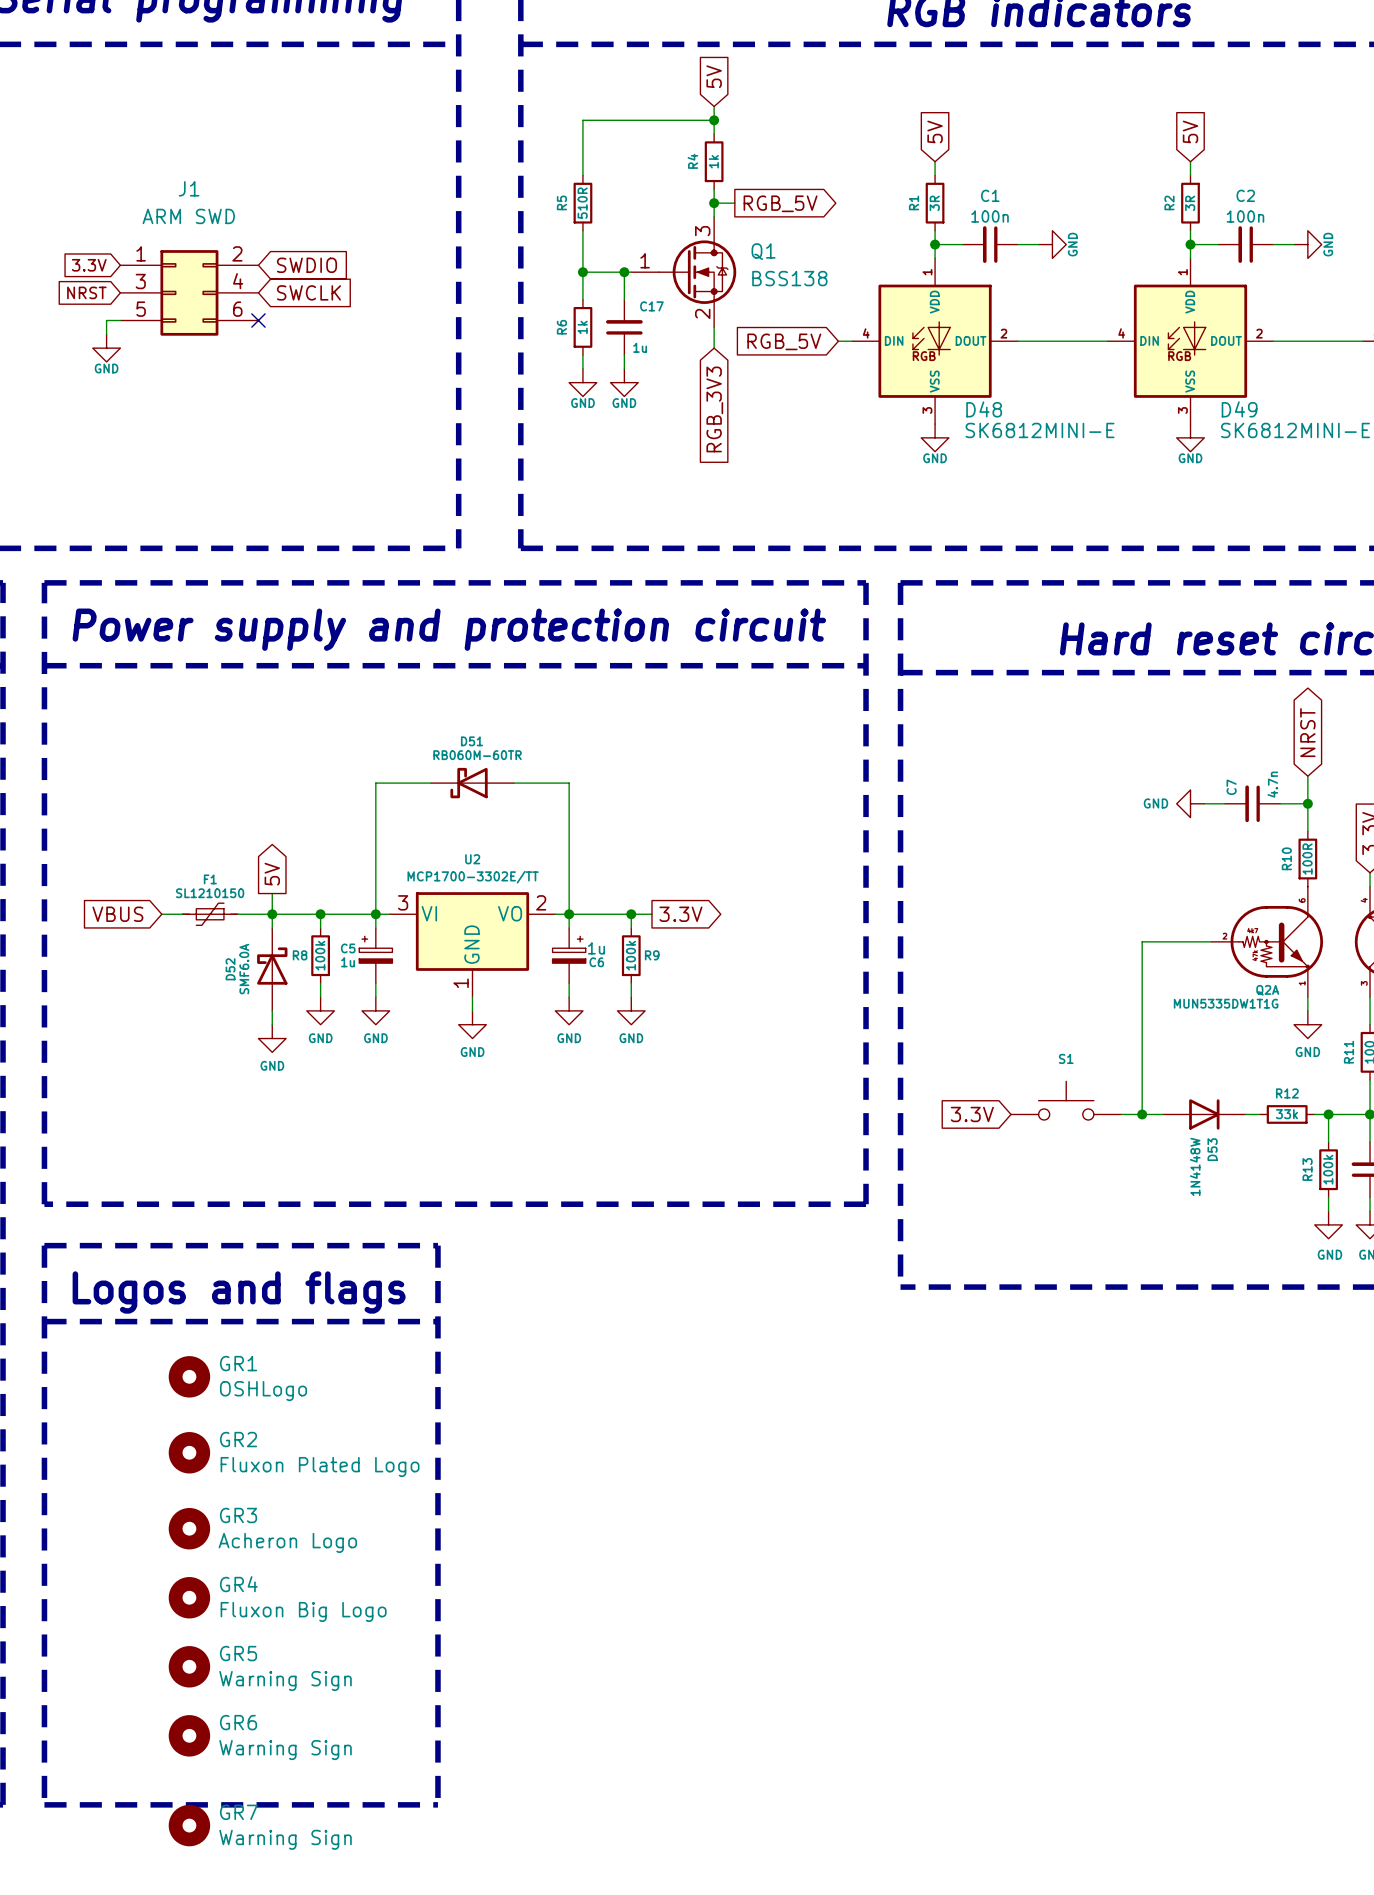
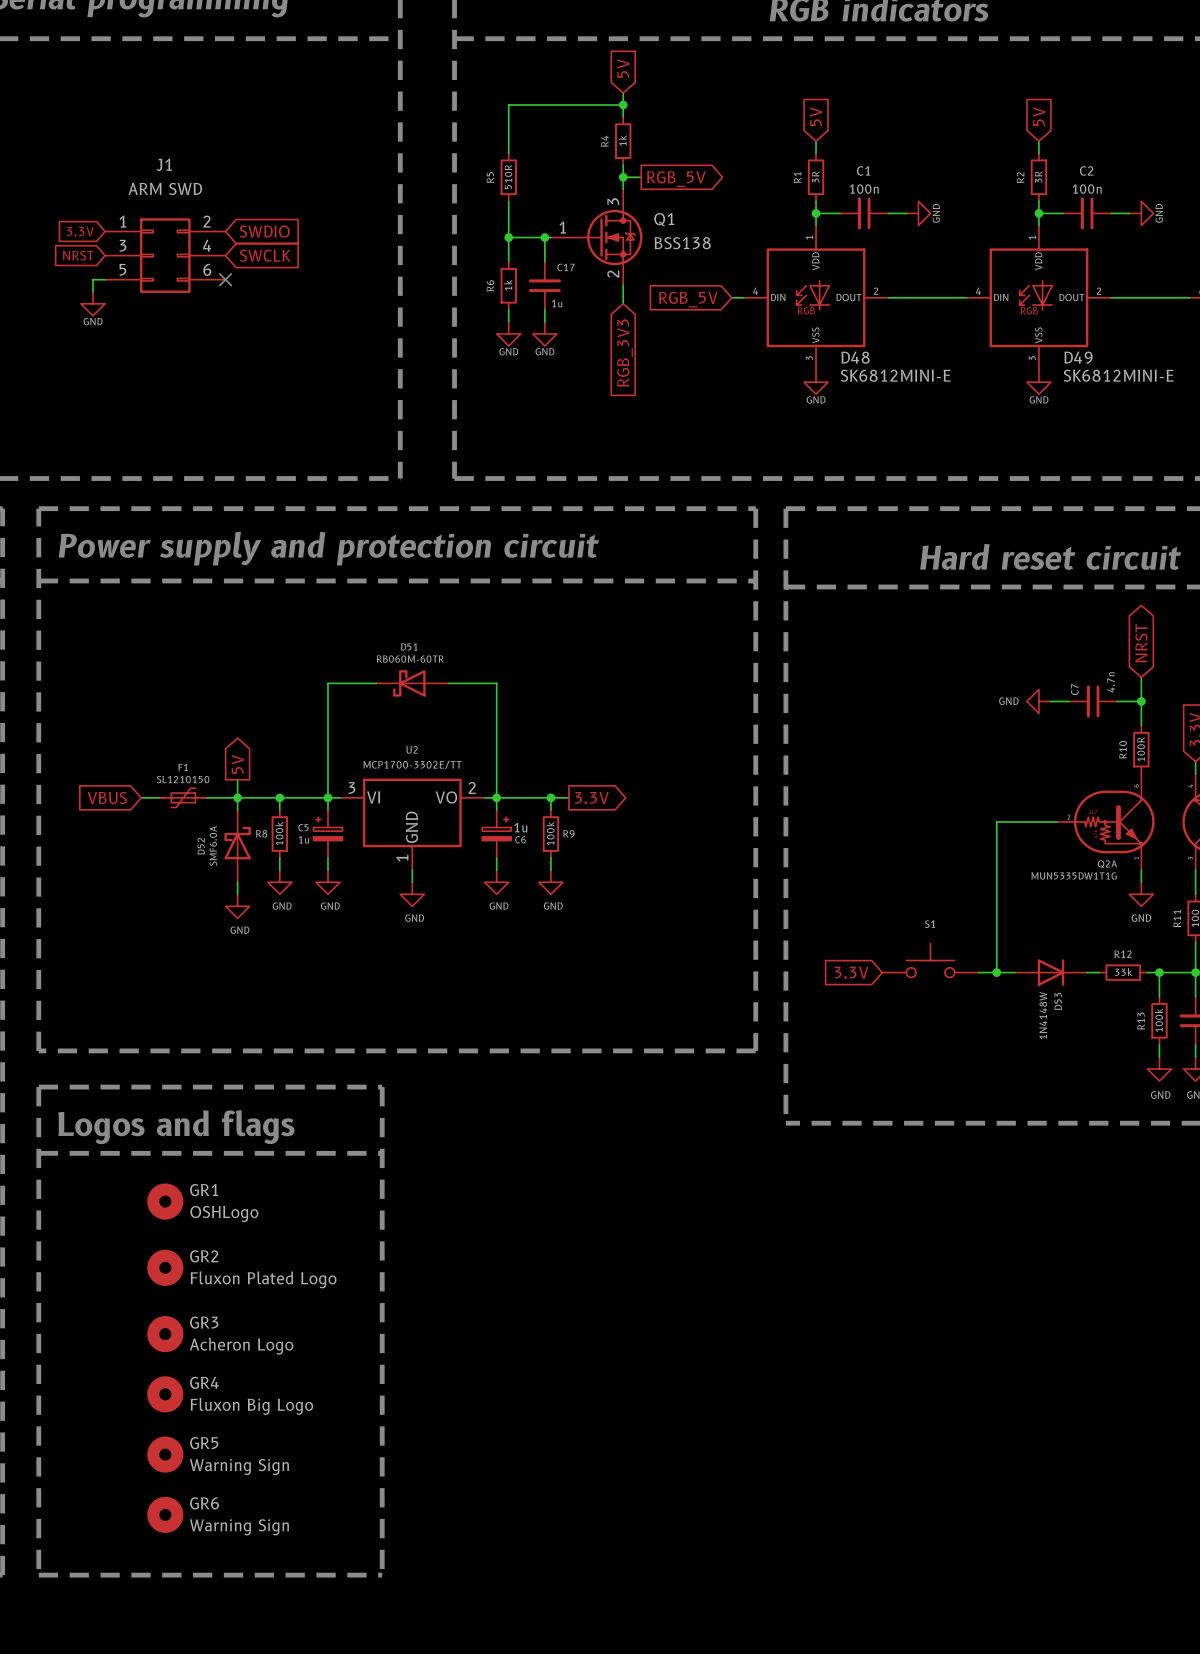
GR7: Warning Sign (189, 1825) -> none

